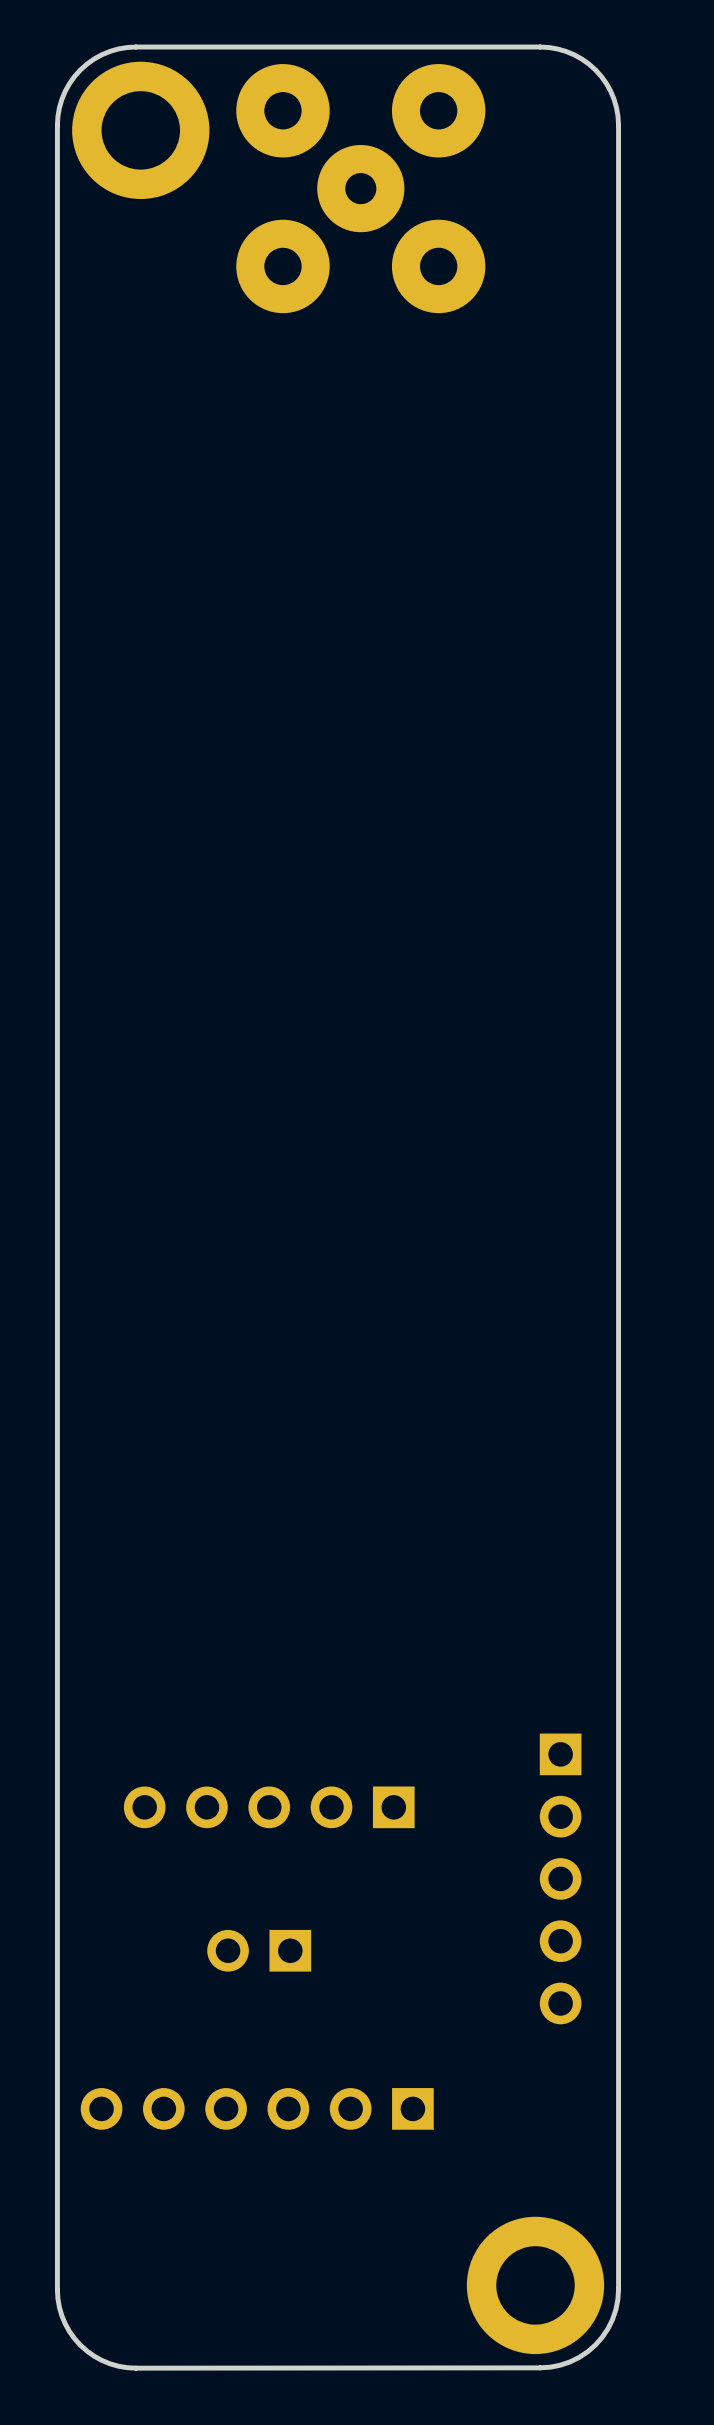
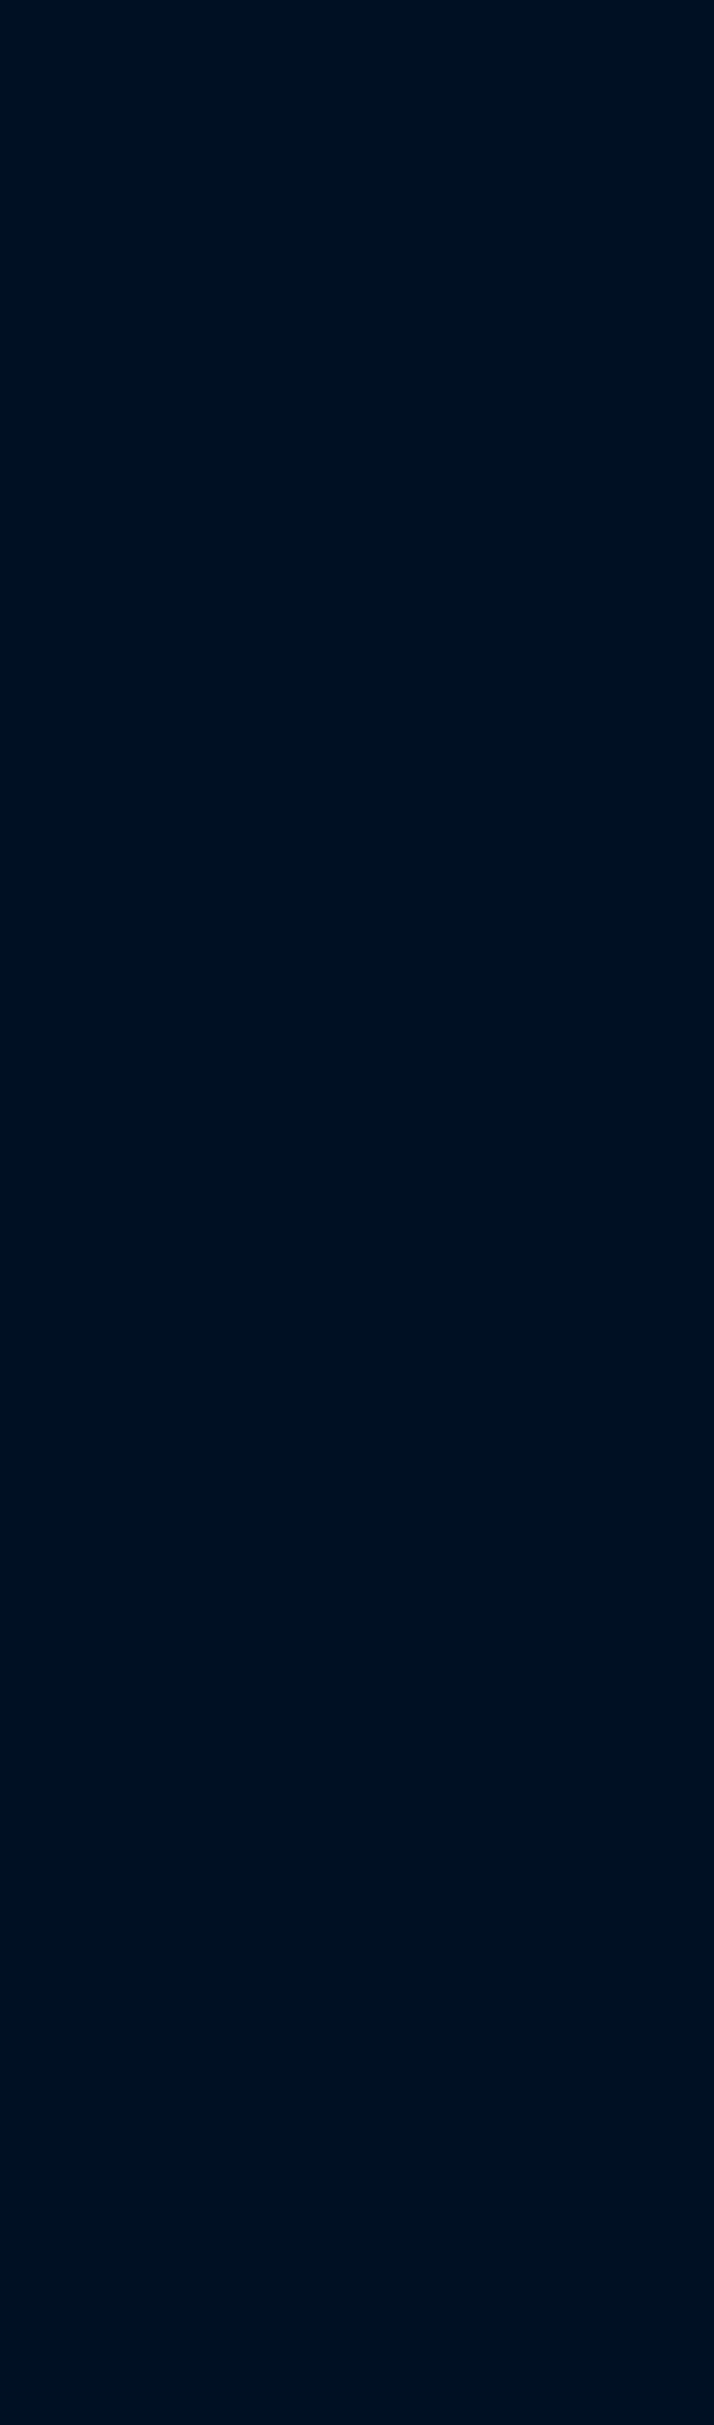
board edge: (540, 47) (127, 47) (101, 54) (80, 69) (69, 83) (59, 108) (57, 125) (57, 2289) (61, 2315) (74, 2338) (94, 2356) (118, 2366) (135, 2368) (550, 2367) (570, 2361) (595, 2344) (608, 2328) (617, 2299) (618, 125) (616, 108) (610, 91) (595, 69) (574, 54) (557, 48) (540, 47) -> none
part: (140, 130) -> none
part: (360, 188) -> none
part: (269, 1807) -> none
part: (560, 1878) -> none
part: (259, 1950) -> none
part: (257, 2108) -> none
part: (535, 2285) -> none

